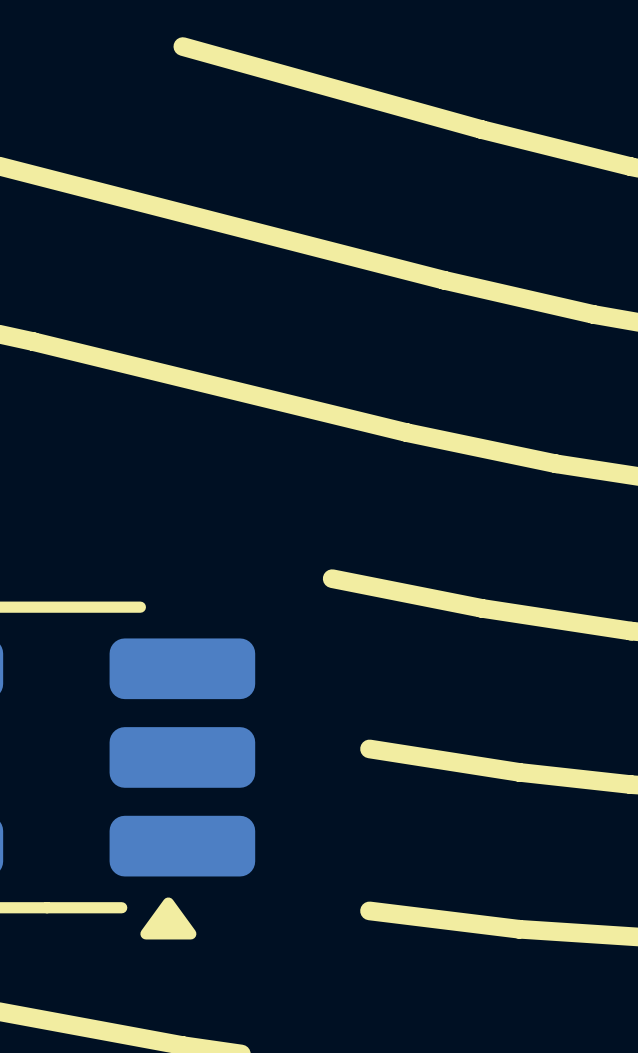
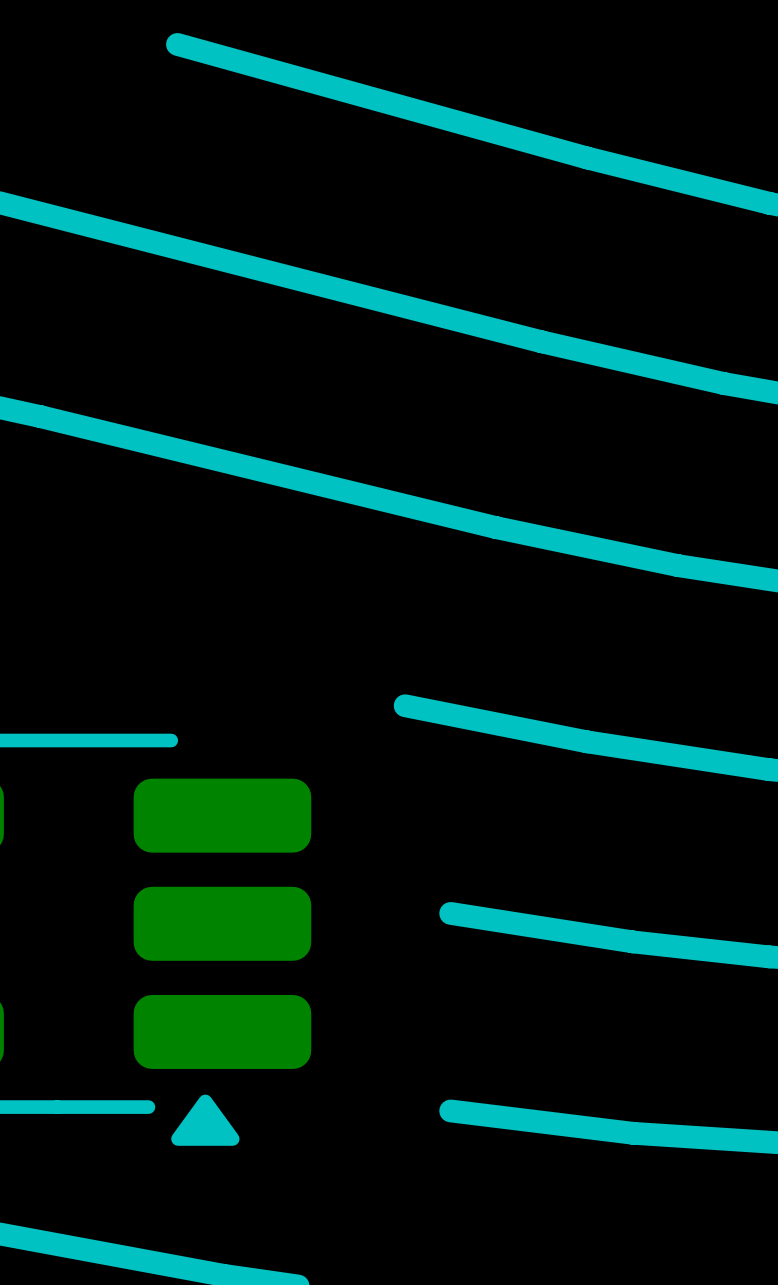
line: (182, 46) (481, 129) -> (177, 44) (587, 157)

